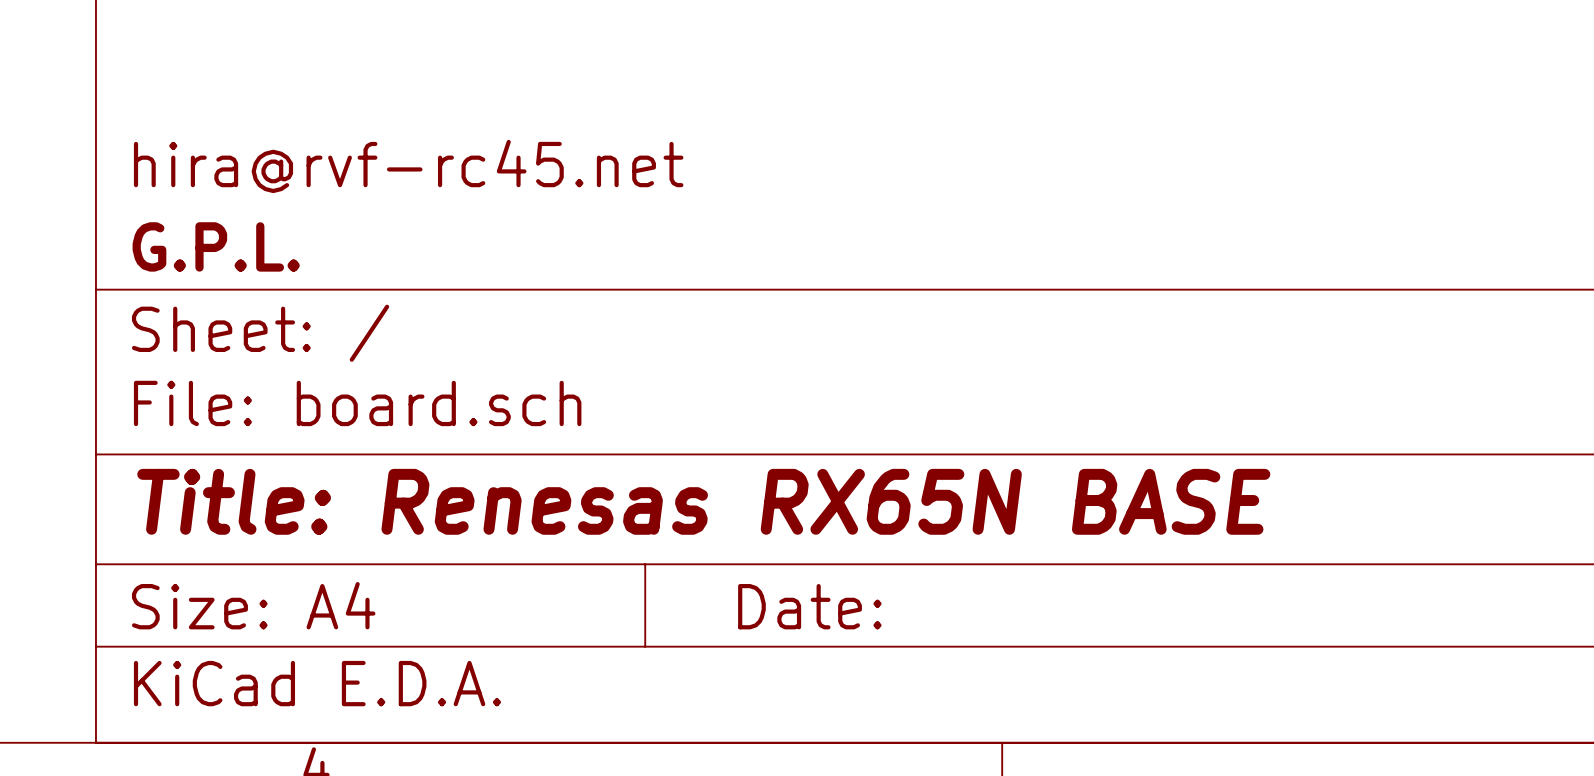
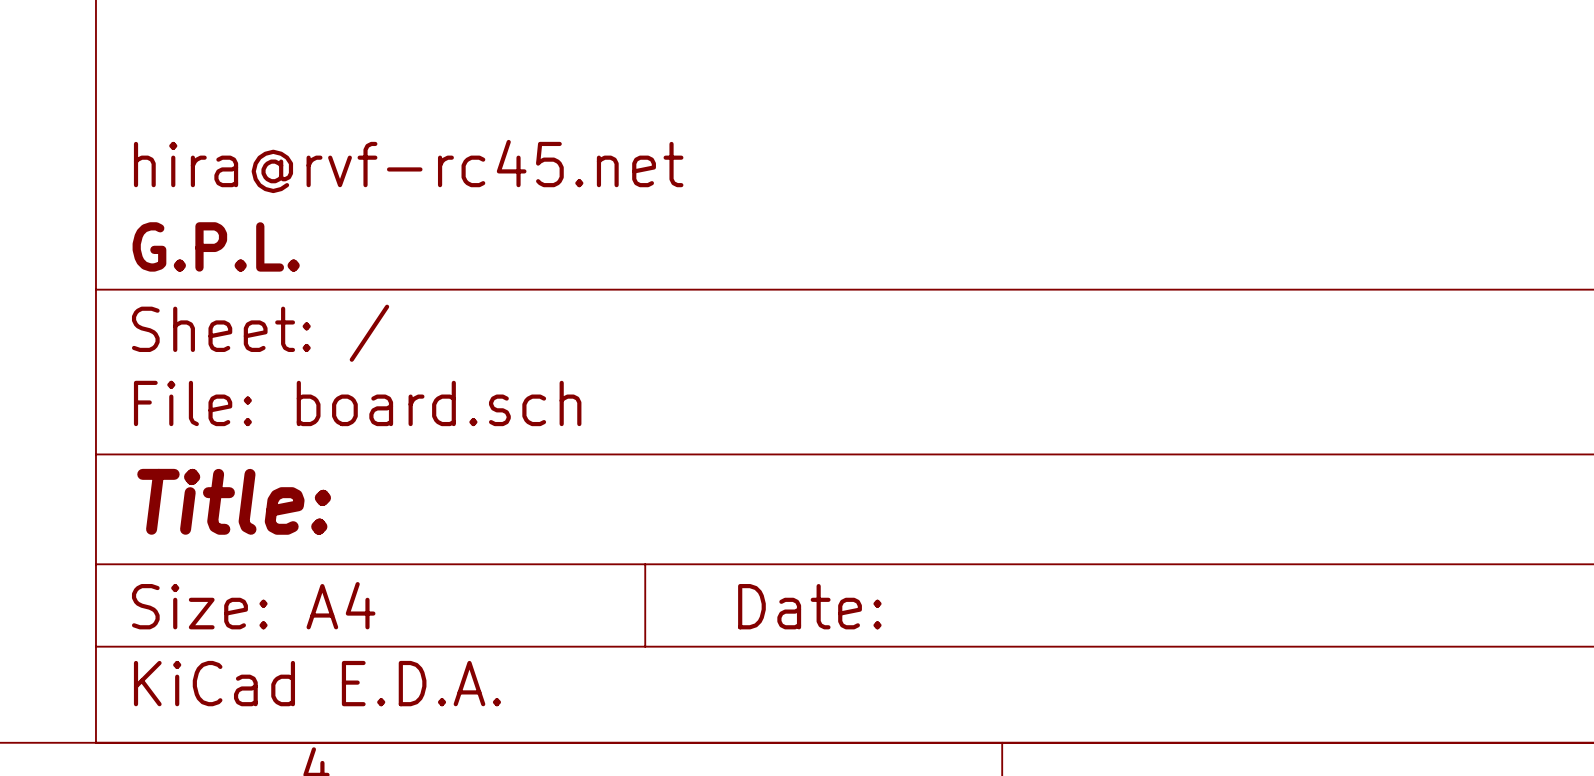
title block: Title: Renesas RX65N BASE (703, 501) -> Title: (234, 501)

